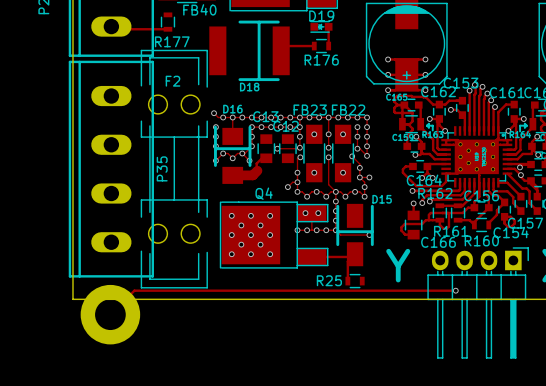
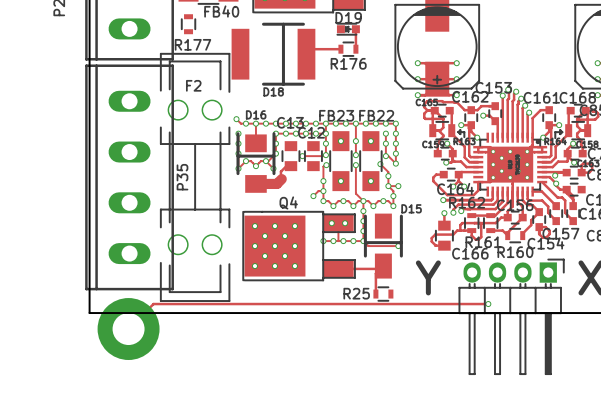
track: (114, 29) (167, 29) -> none

